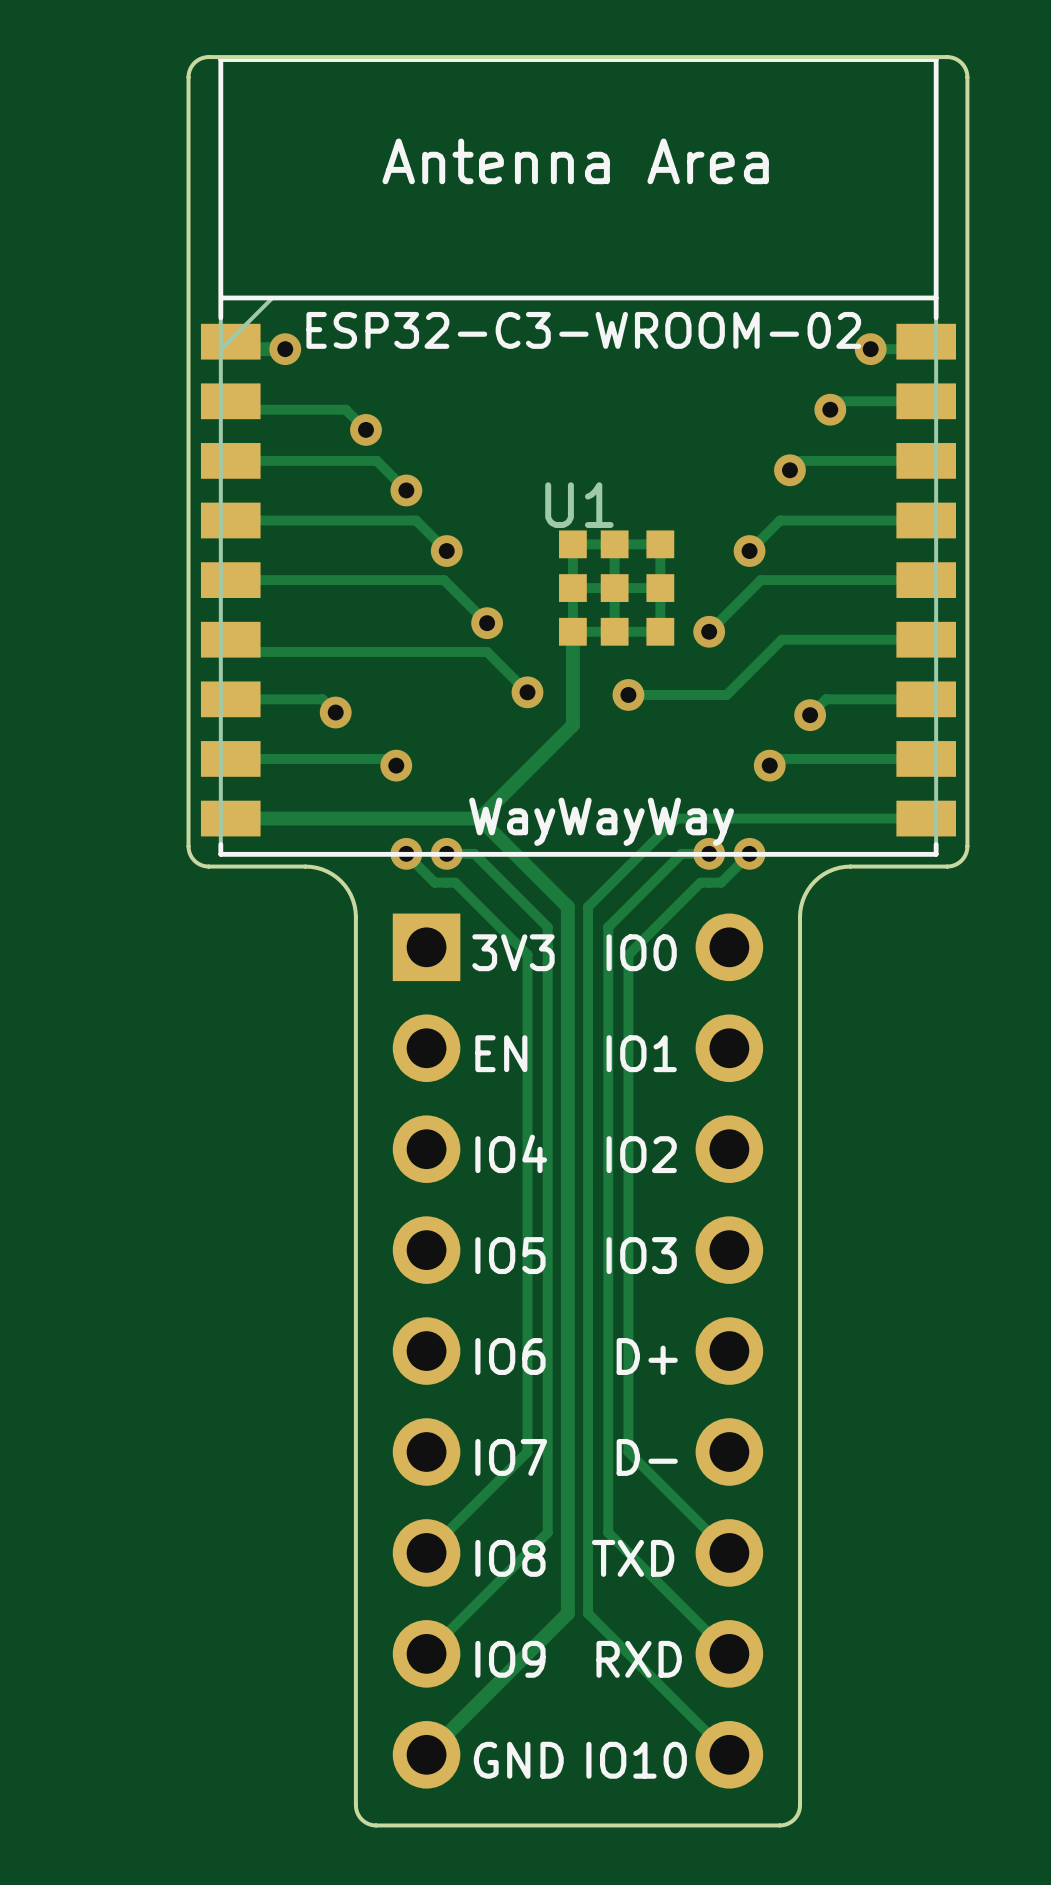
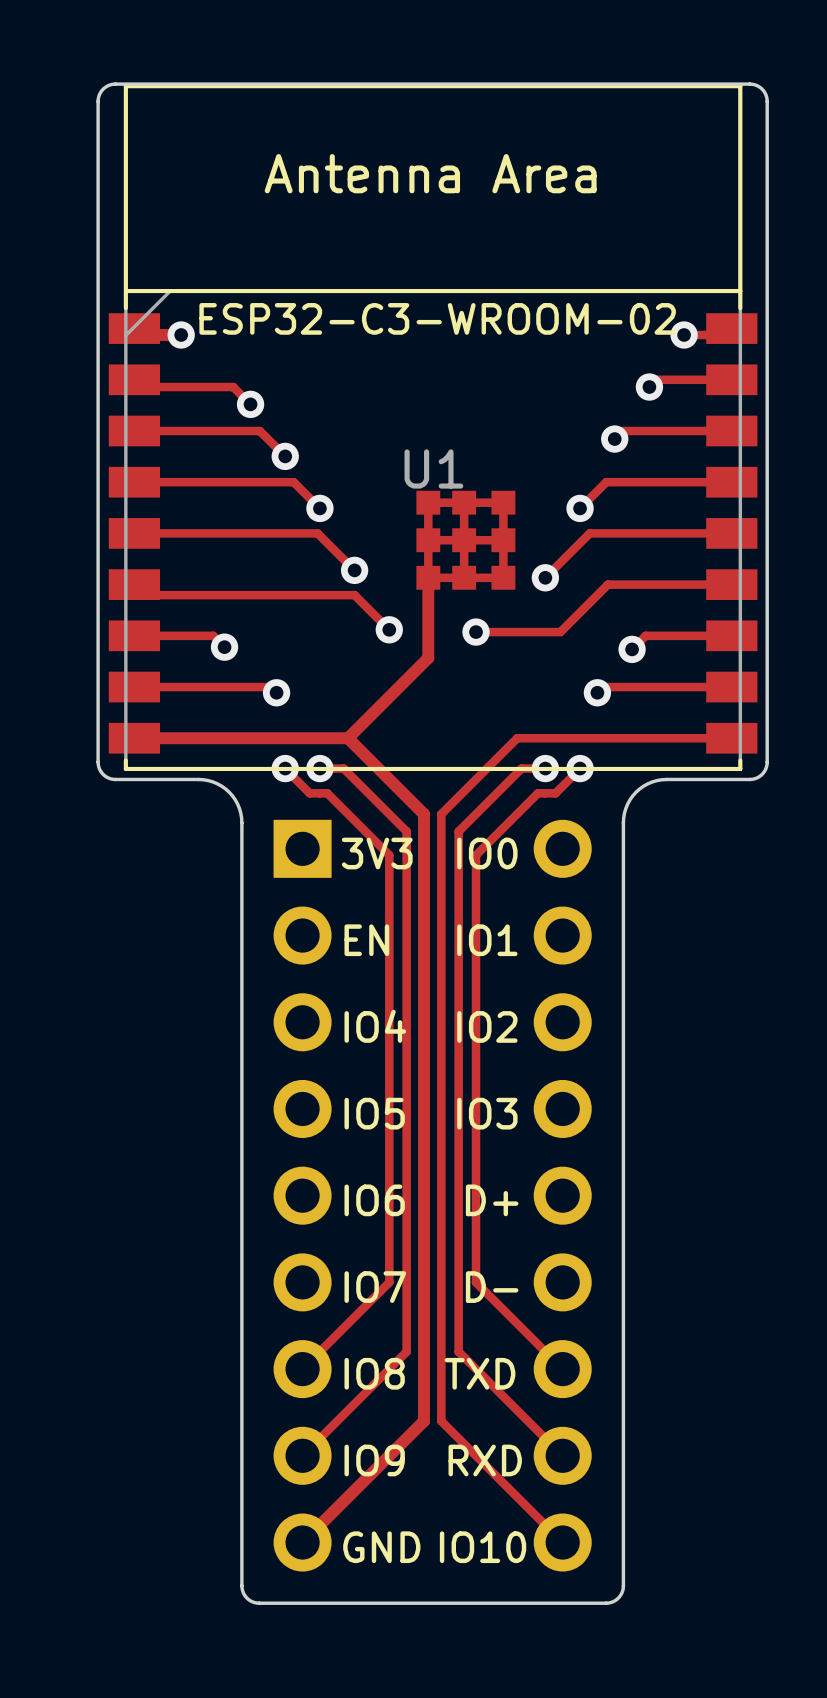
text: WayWayWay (601, 821) -> none

